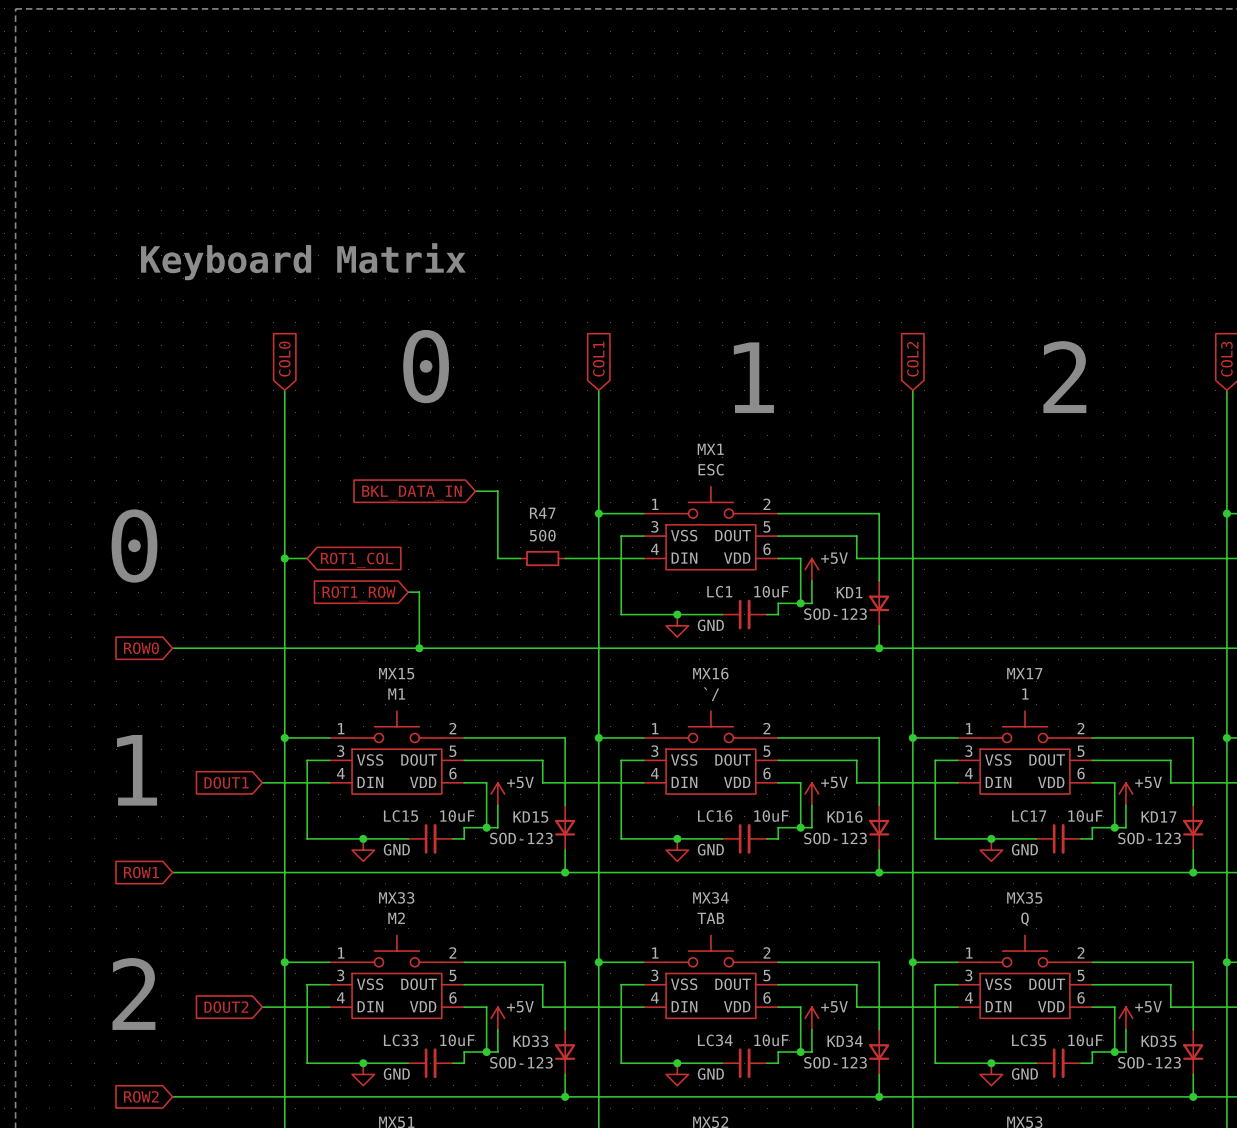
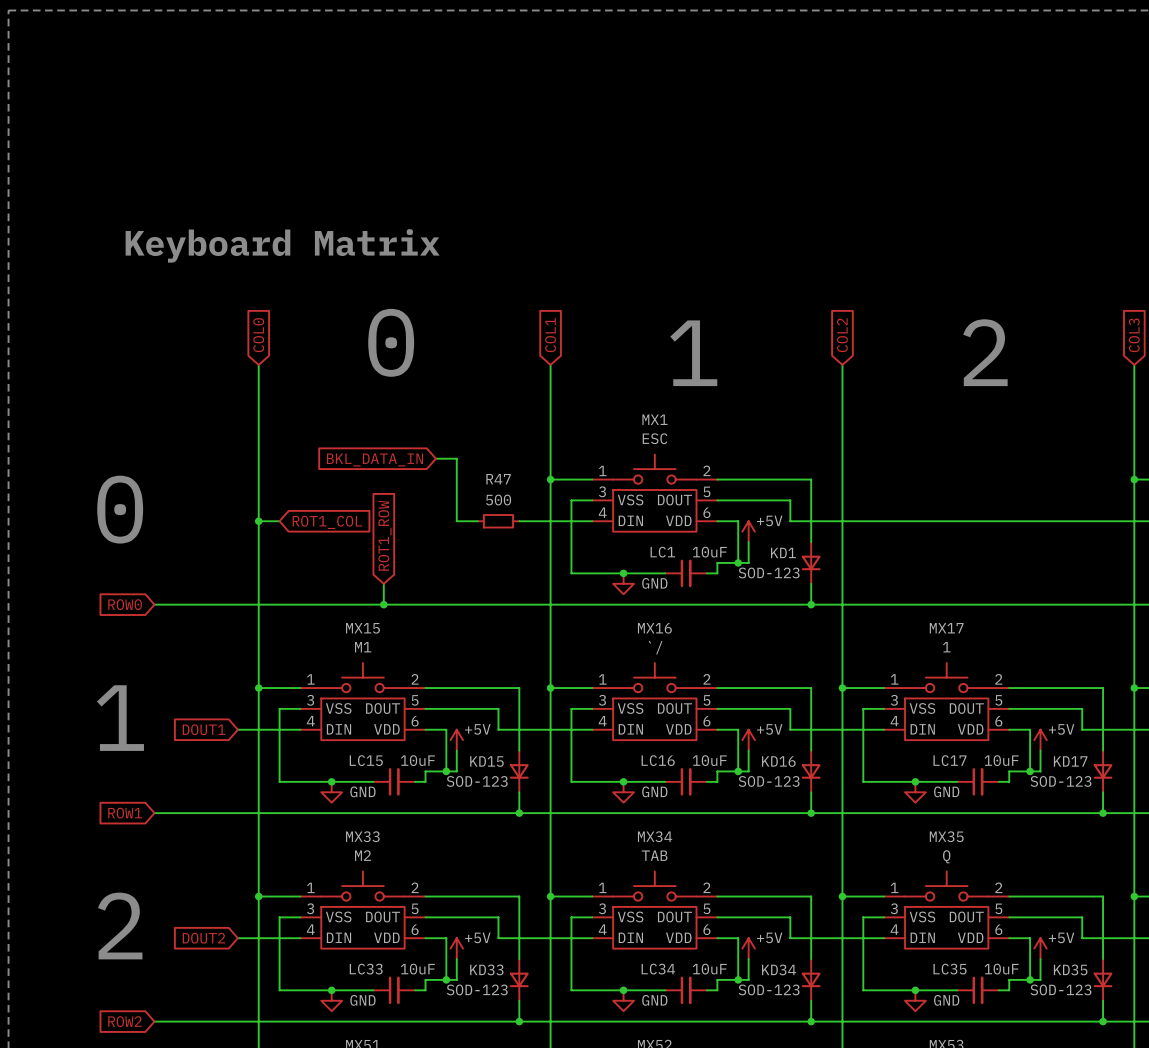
wire: (408, 592) (419, 592) (419, 625) -> none
global label rotation: 0° (359, 593) -> 90° clockwise (384, 535)

